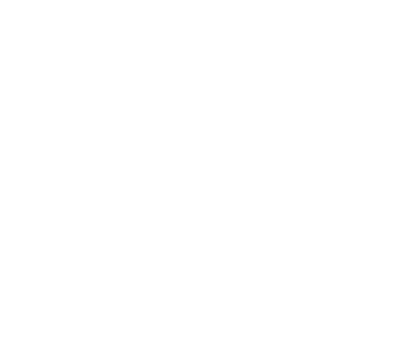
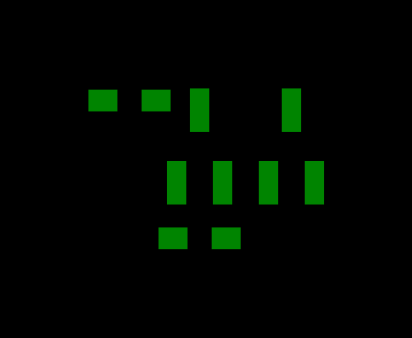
part: none -> (129, 100)
part: none -> (199, 146)
part: none -> (291, 146)
part: none -> (199, 238)

